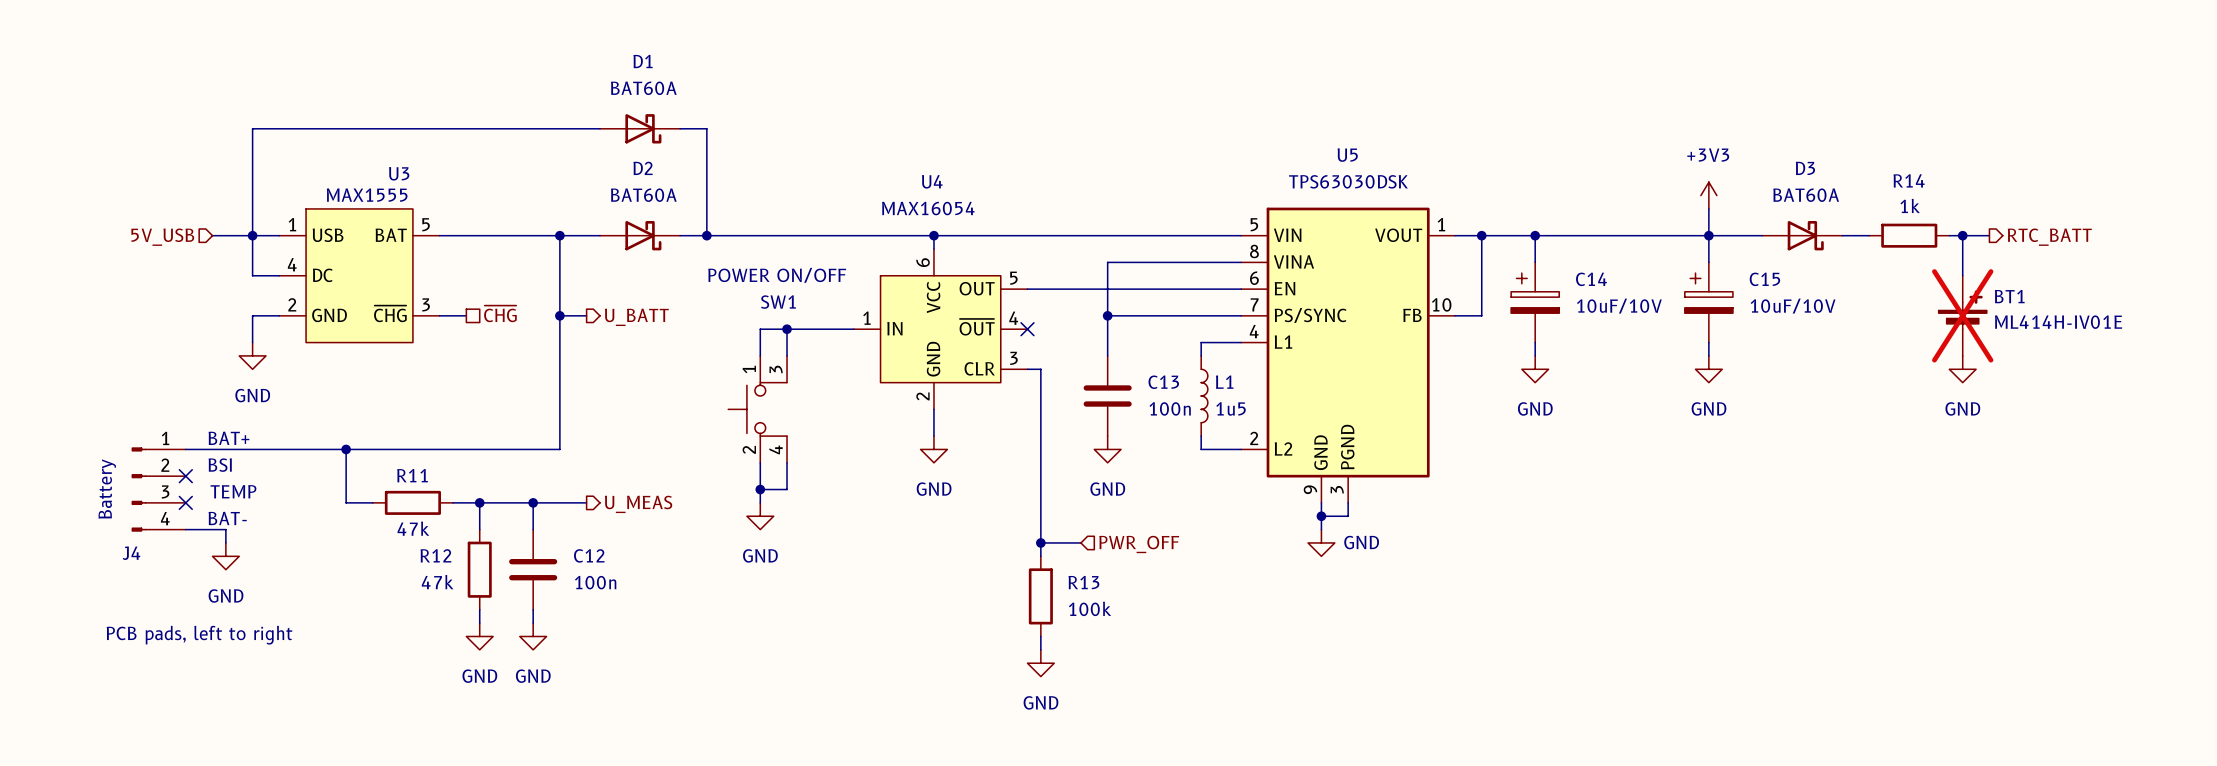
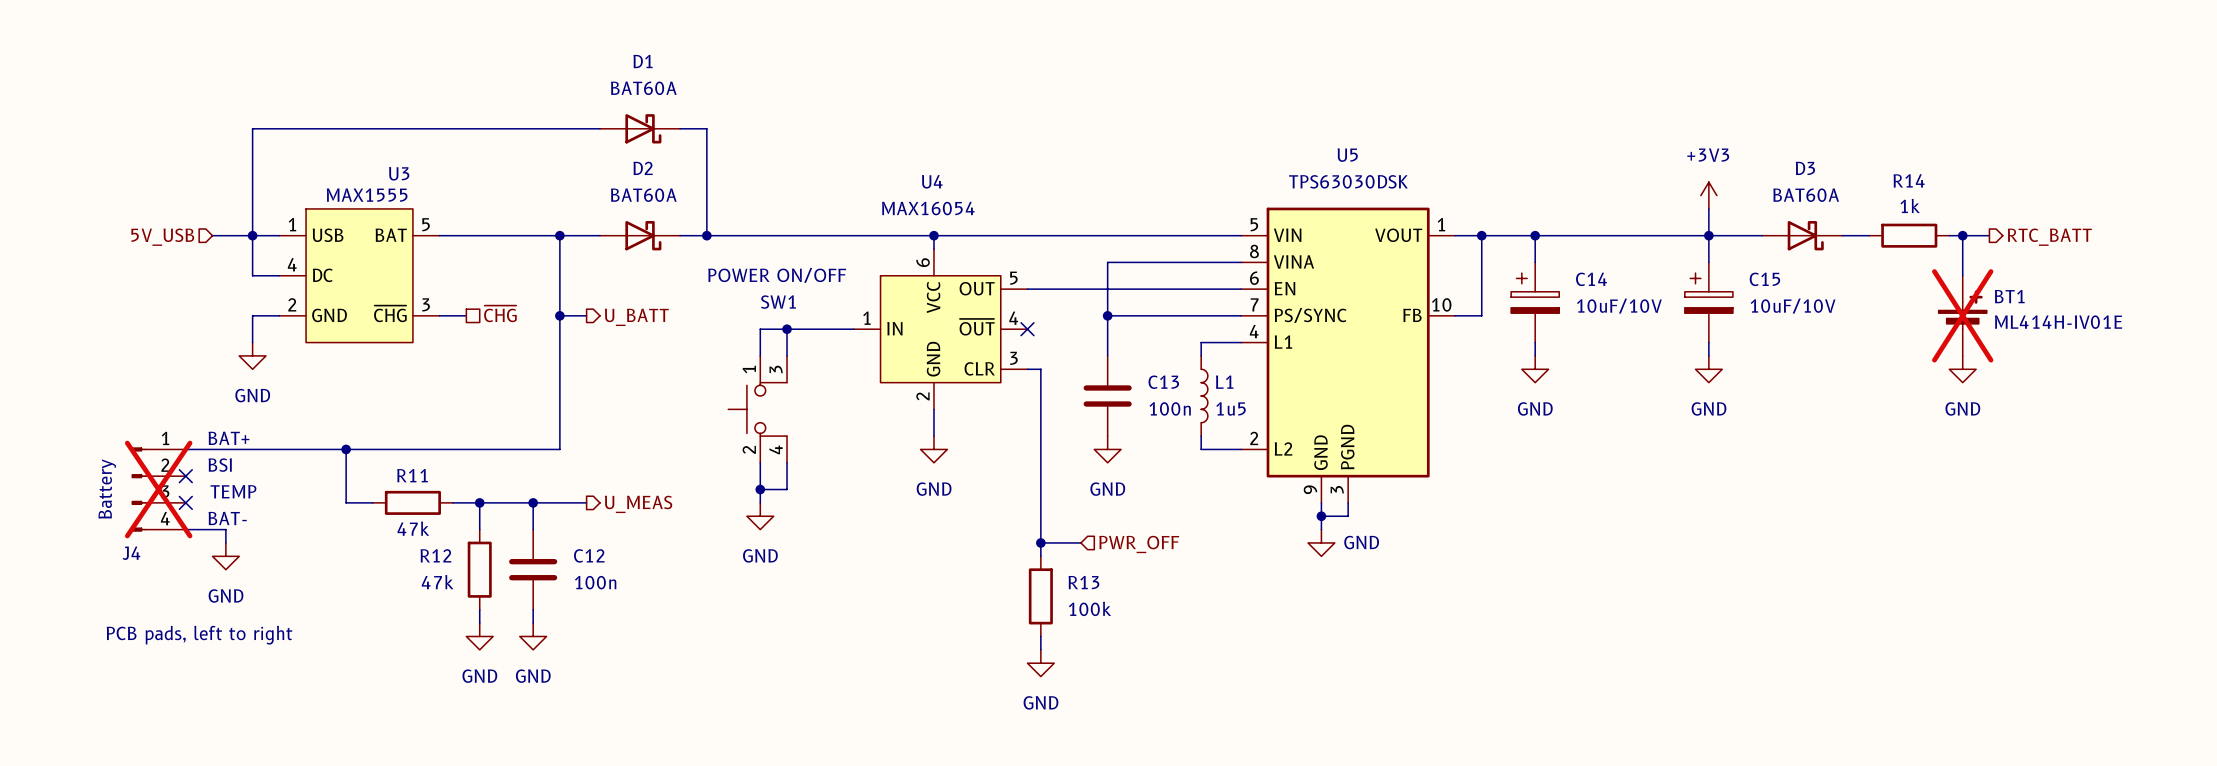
J4 do-not-place cross: none -> (158, 489)

